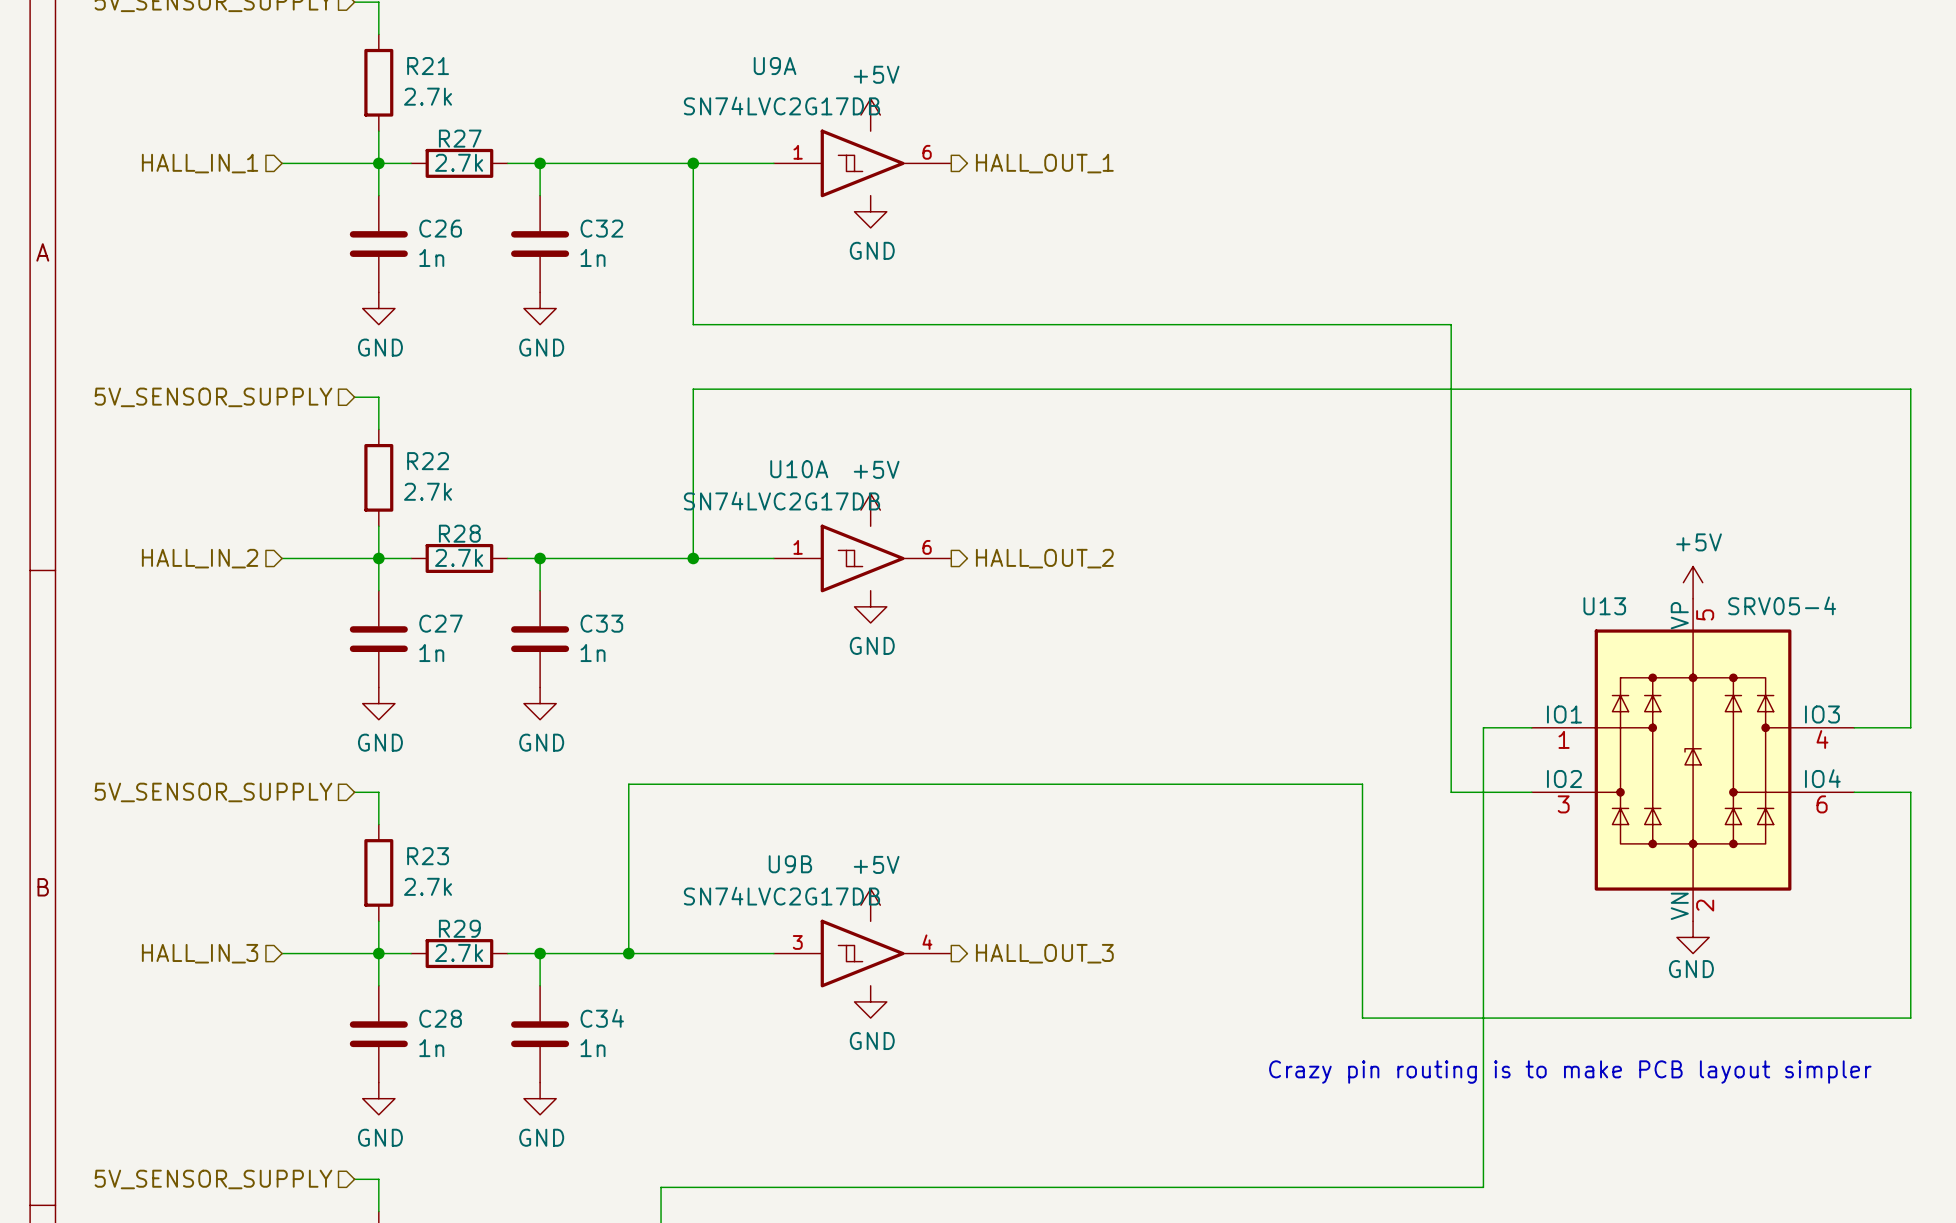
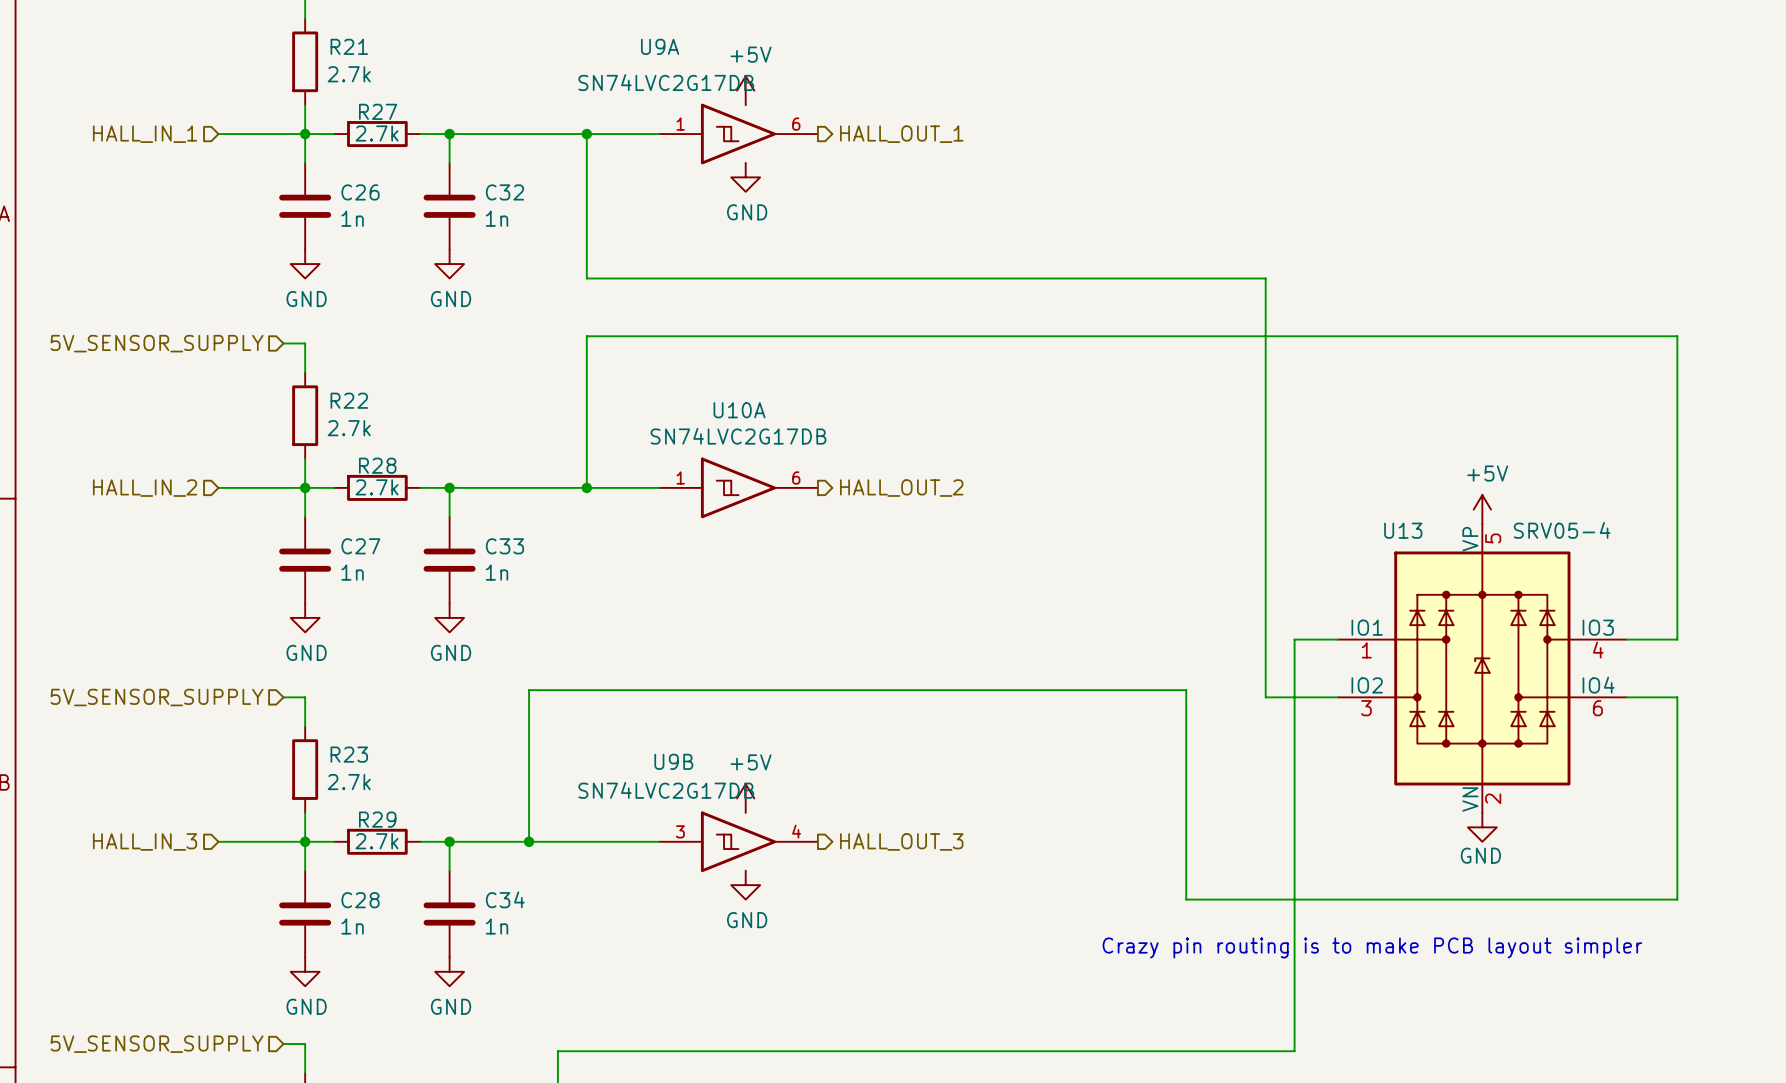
U10A name position: U10A (799, 469) -> U10A (739, 410)
U10A value position: SN74LVC2G17DB (781, 501) -> SN74LVC2G17DB (738, 436)
power symbol: +5V (870, 510) -> none
power symbol: GND (870, 606) -> none

